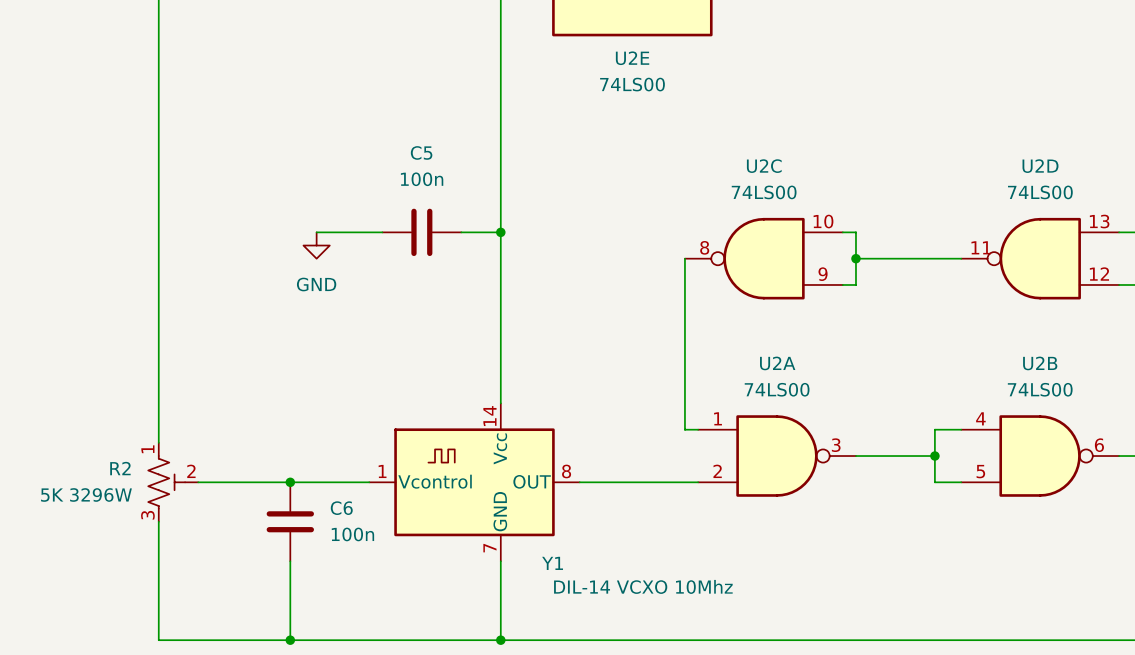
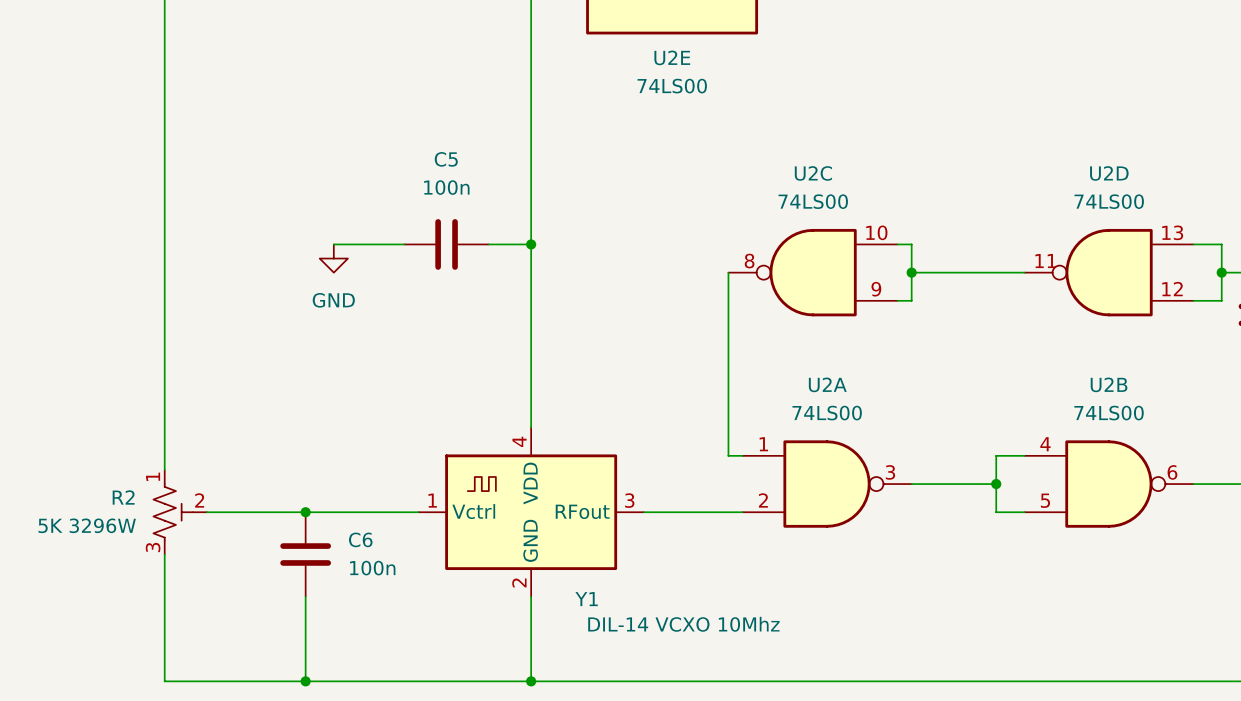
Y1 symbol: [369, 403, 580, 562] -> [418, 427, 644, 597]

